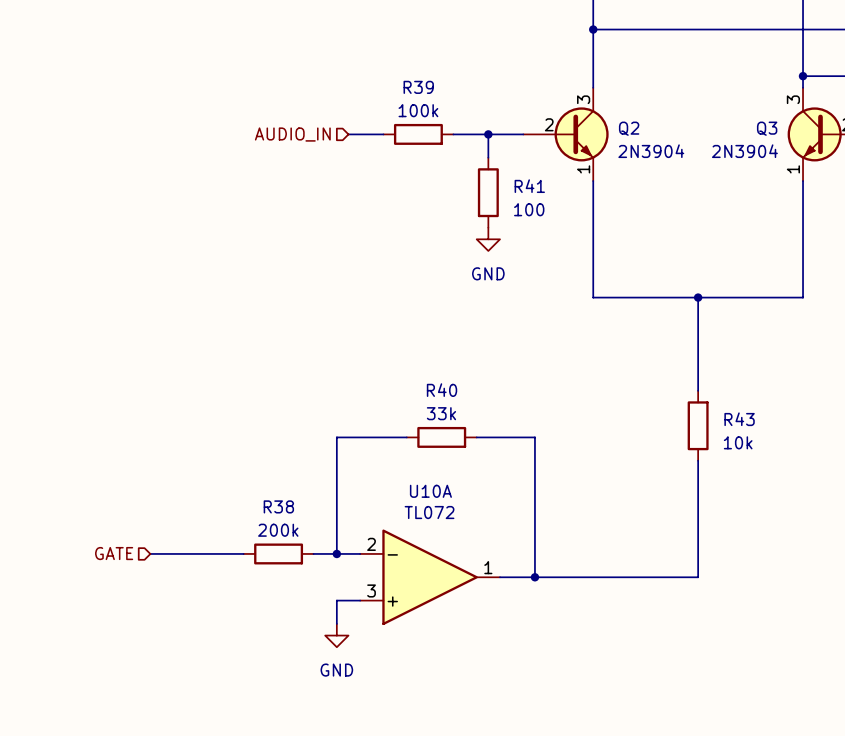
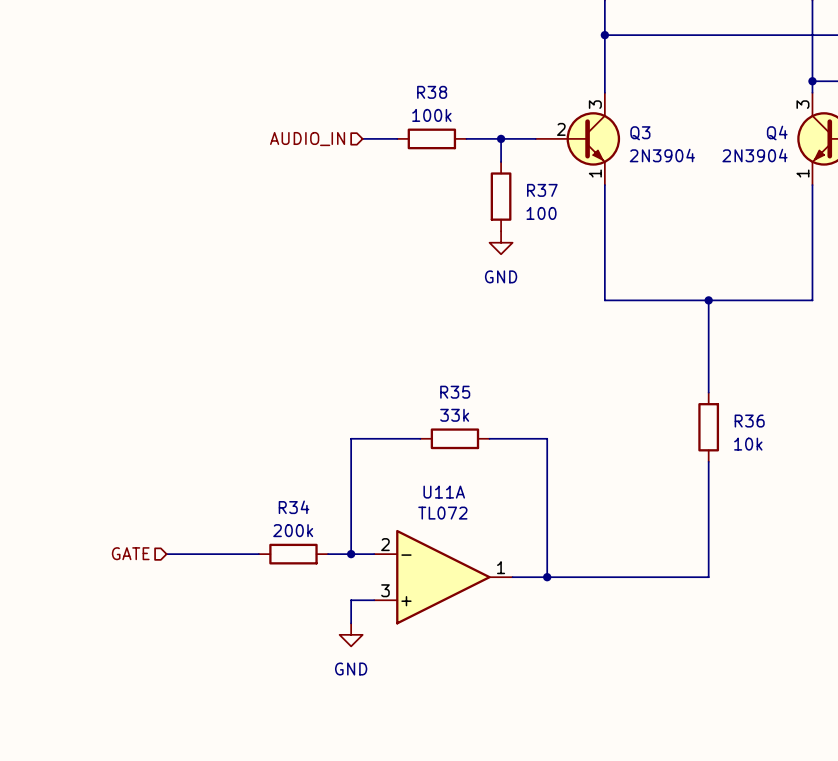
R39 name: R39 (418, 87) -> R38 (432, 92)
Q2 name: Q2 (629, 128) -> Q3 (640, 133)
Q3 name: Q3 (767, 128) -> Q4 (777, 132)
R41 name: R41 (529, 186) -> R37 (542, 190)
R40 name: R40 (442, 390) -> R35 (455, 392)
R43 name: R43 (739, 419) -> R36 (749, 421)
U10A name: U10A (430, 491) -> U11A (444, 492)
R38 name: R38 (278, 506) -> R34 (294, 507)

